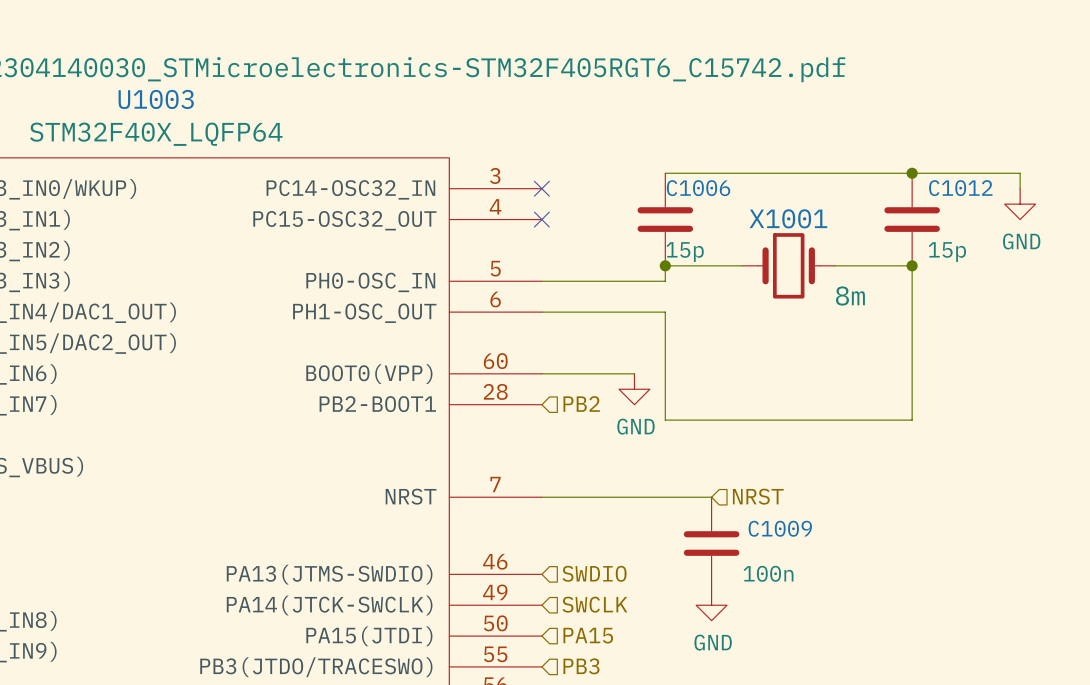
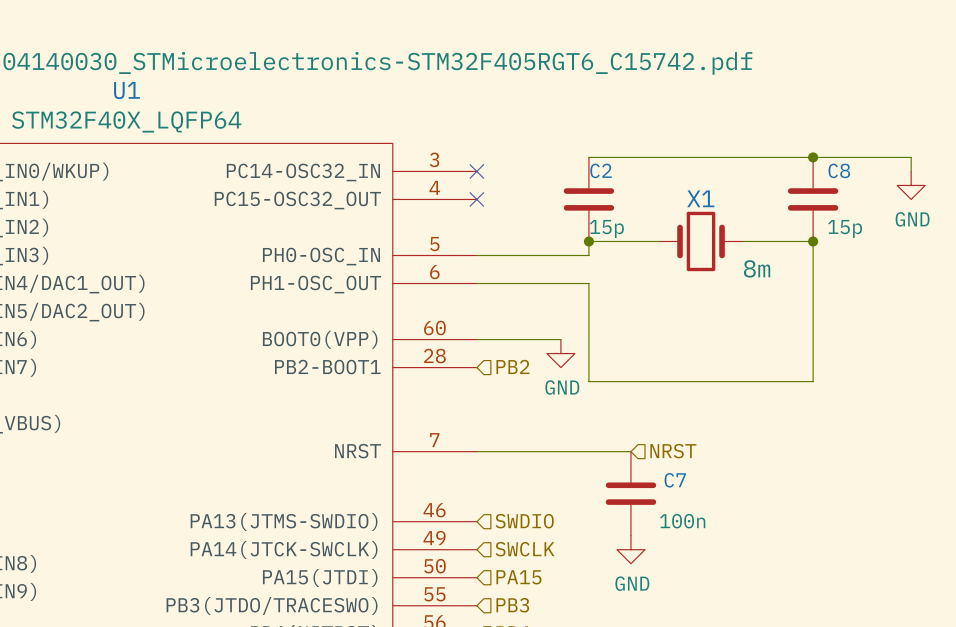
U1003 name: U1003 (156, 99) -> U1 (126, 90)
C1006 name: C1006 (698, 188) -> C2 (601, 170)
C1012 name: C1012 (960, 188) -> C8 (839, 170)
X1001 name: X1001 (788, 218) -> X1 (700, 198)
C1009 name: C1009 (780, 528) -> C7 (675, 480)

